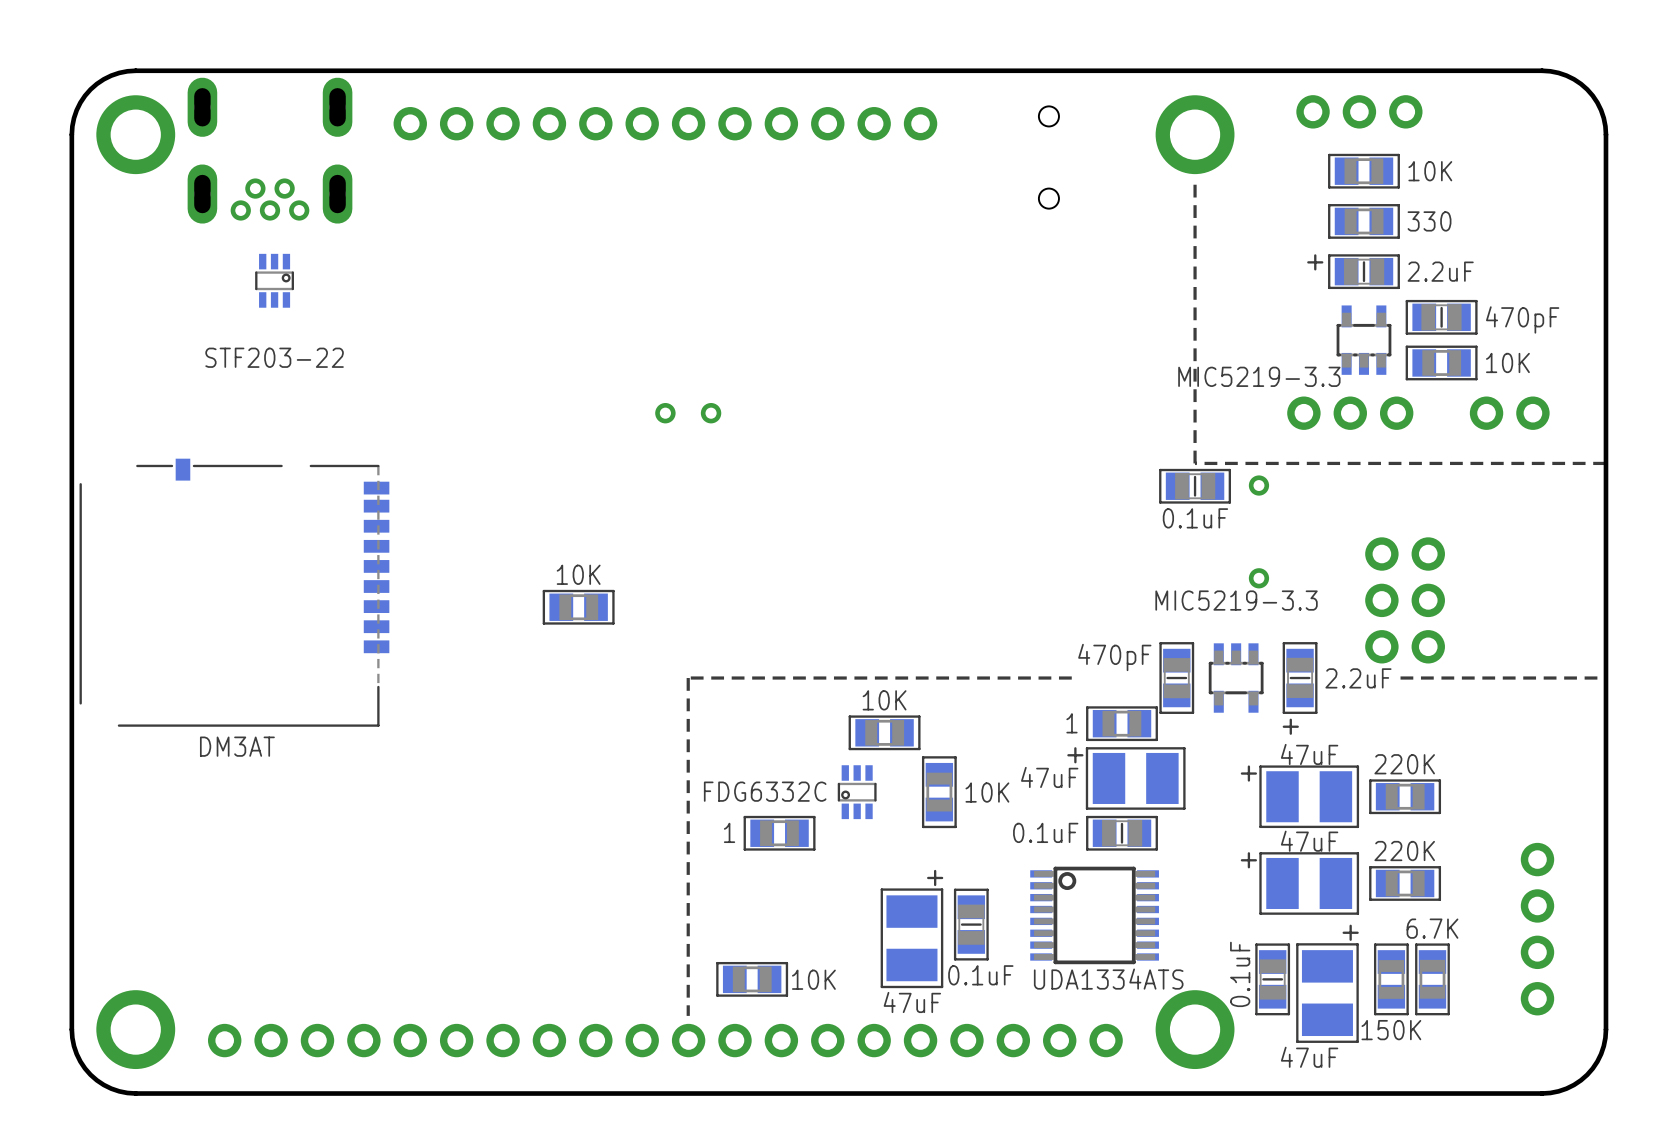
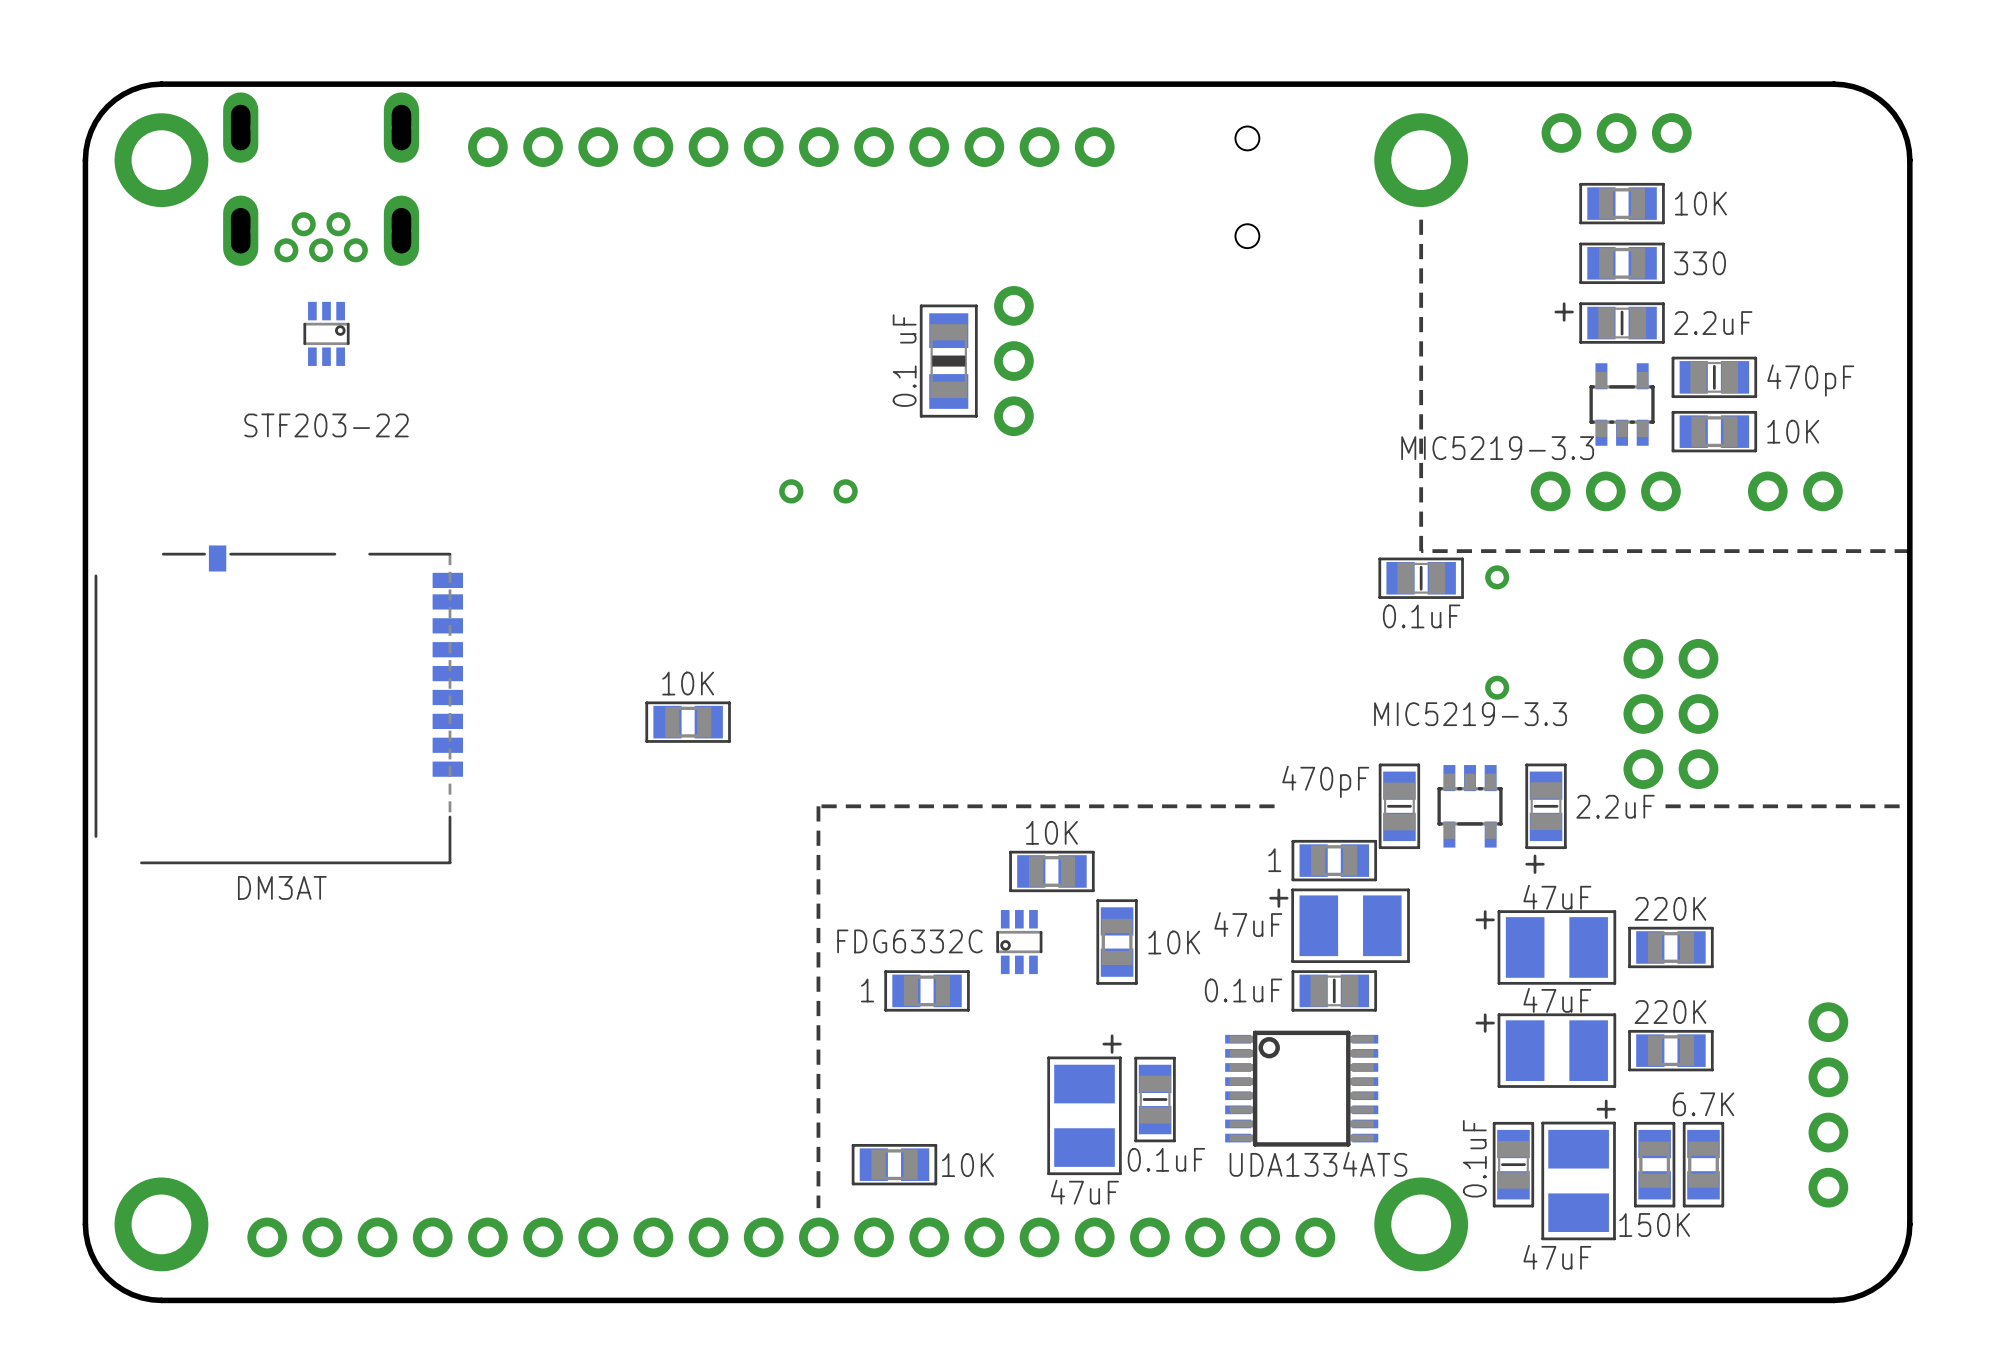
part: none -> 0.1 uF (948, 361)
part: none -> (1013, 361)

